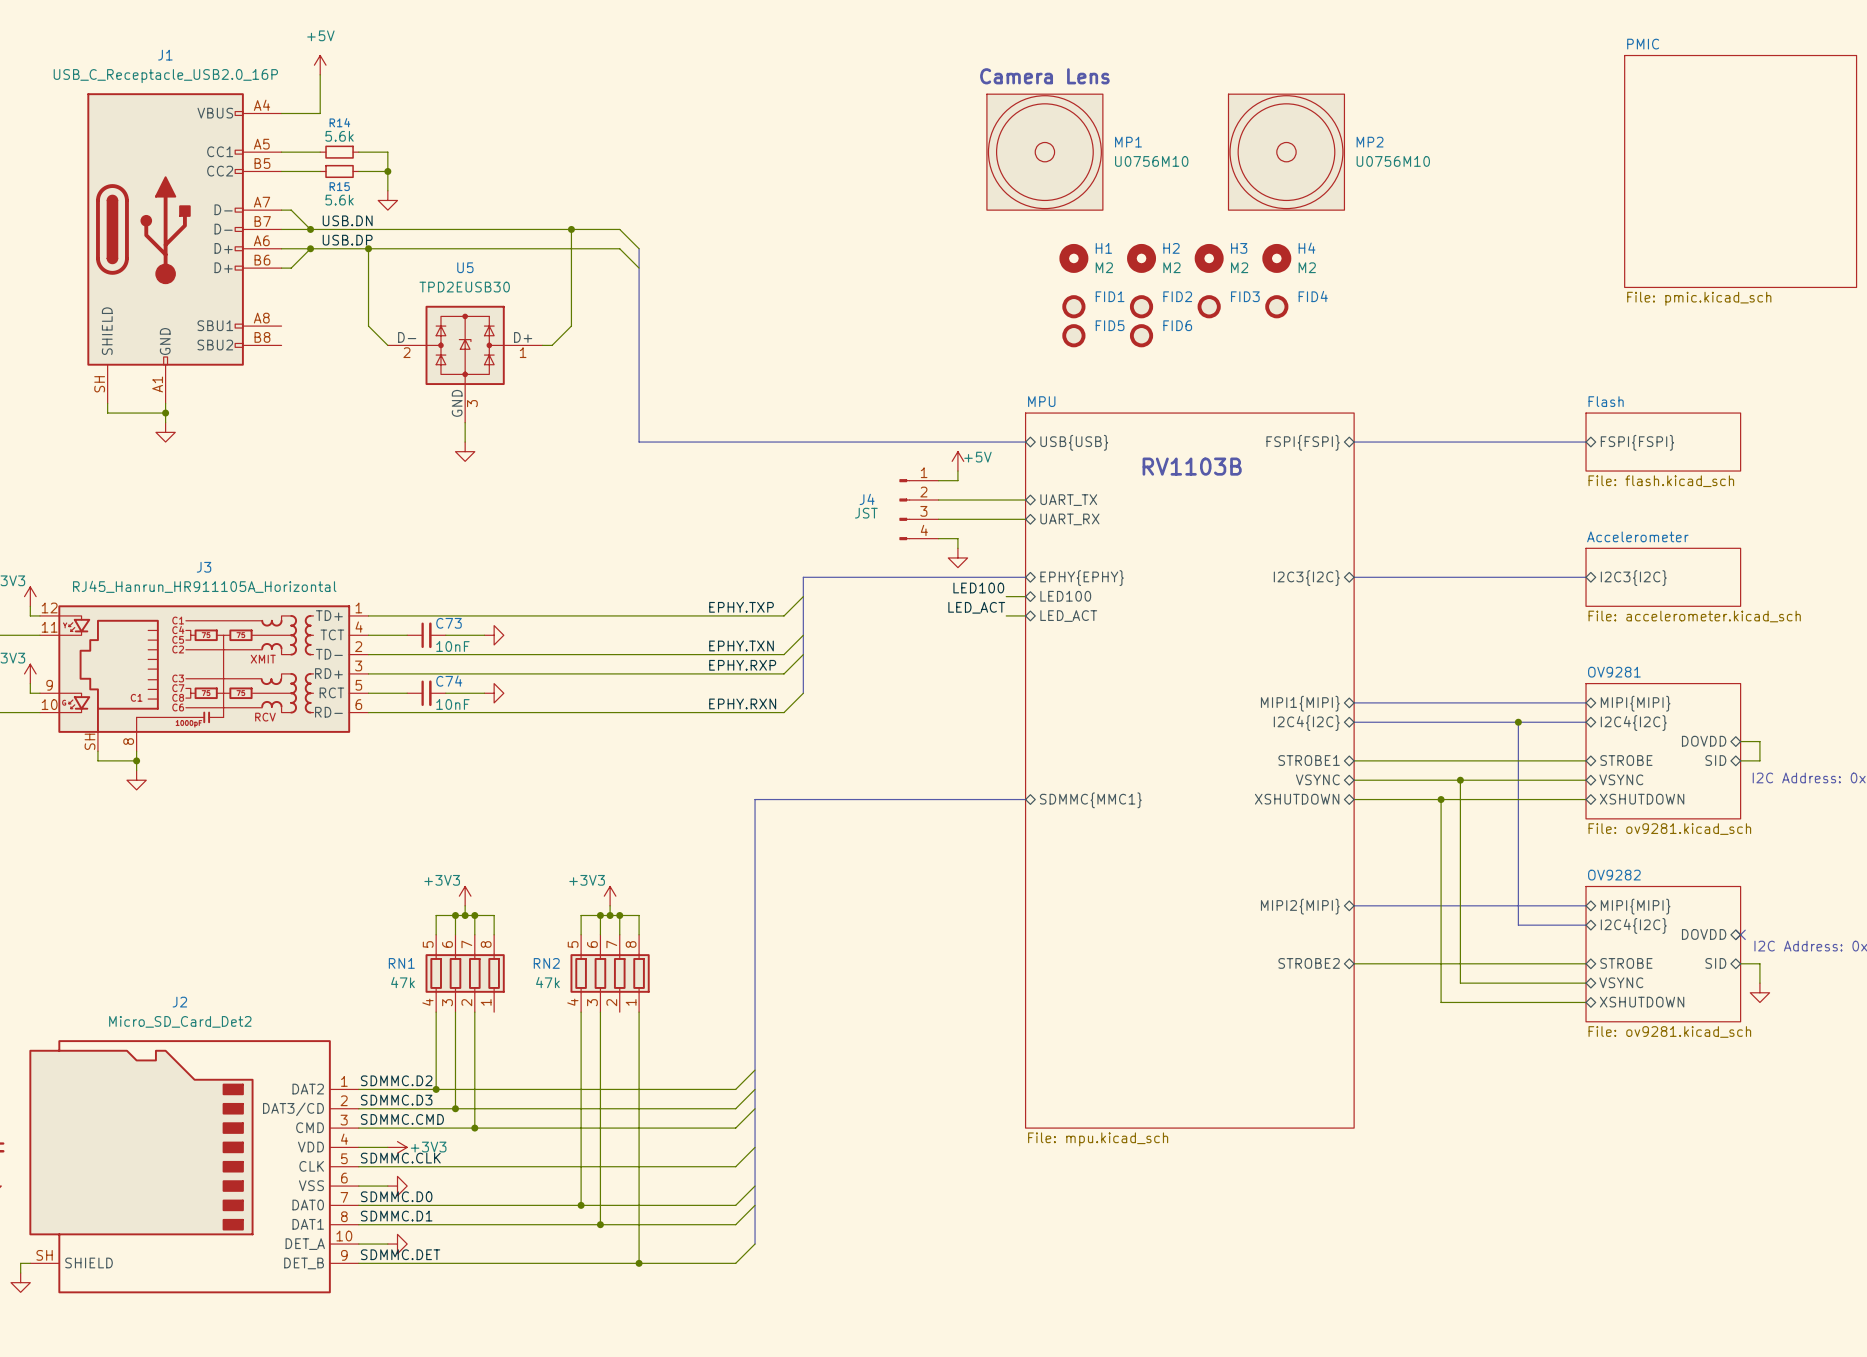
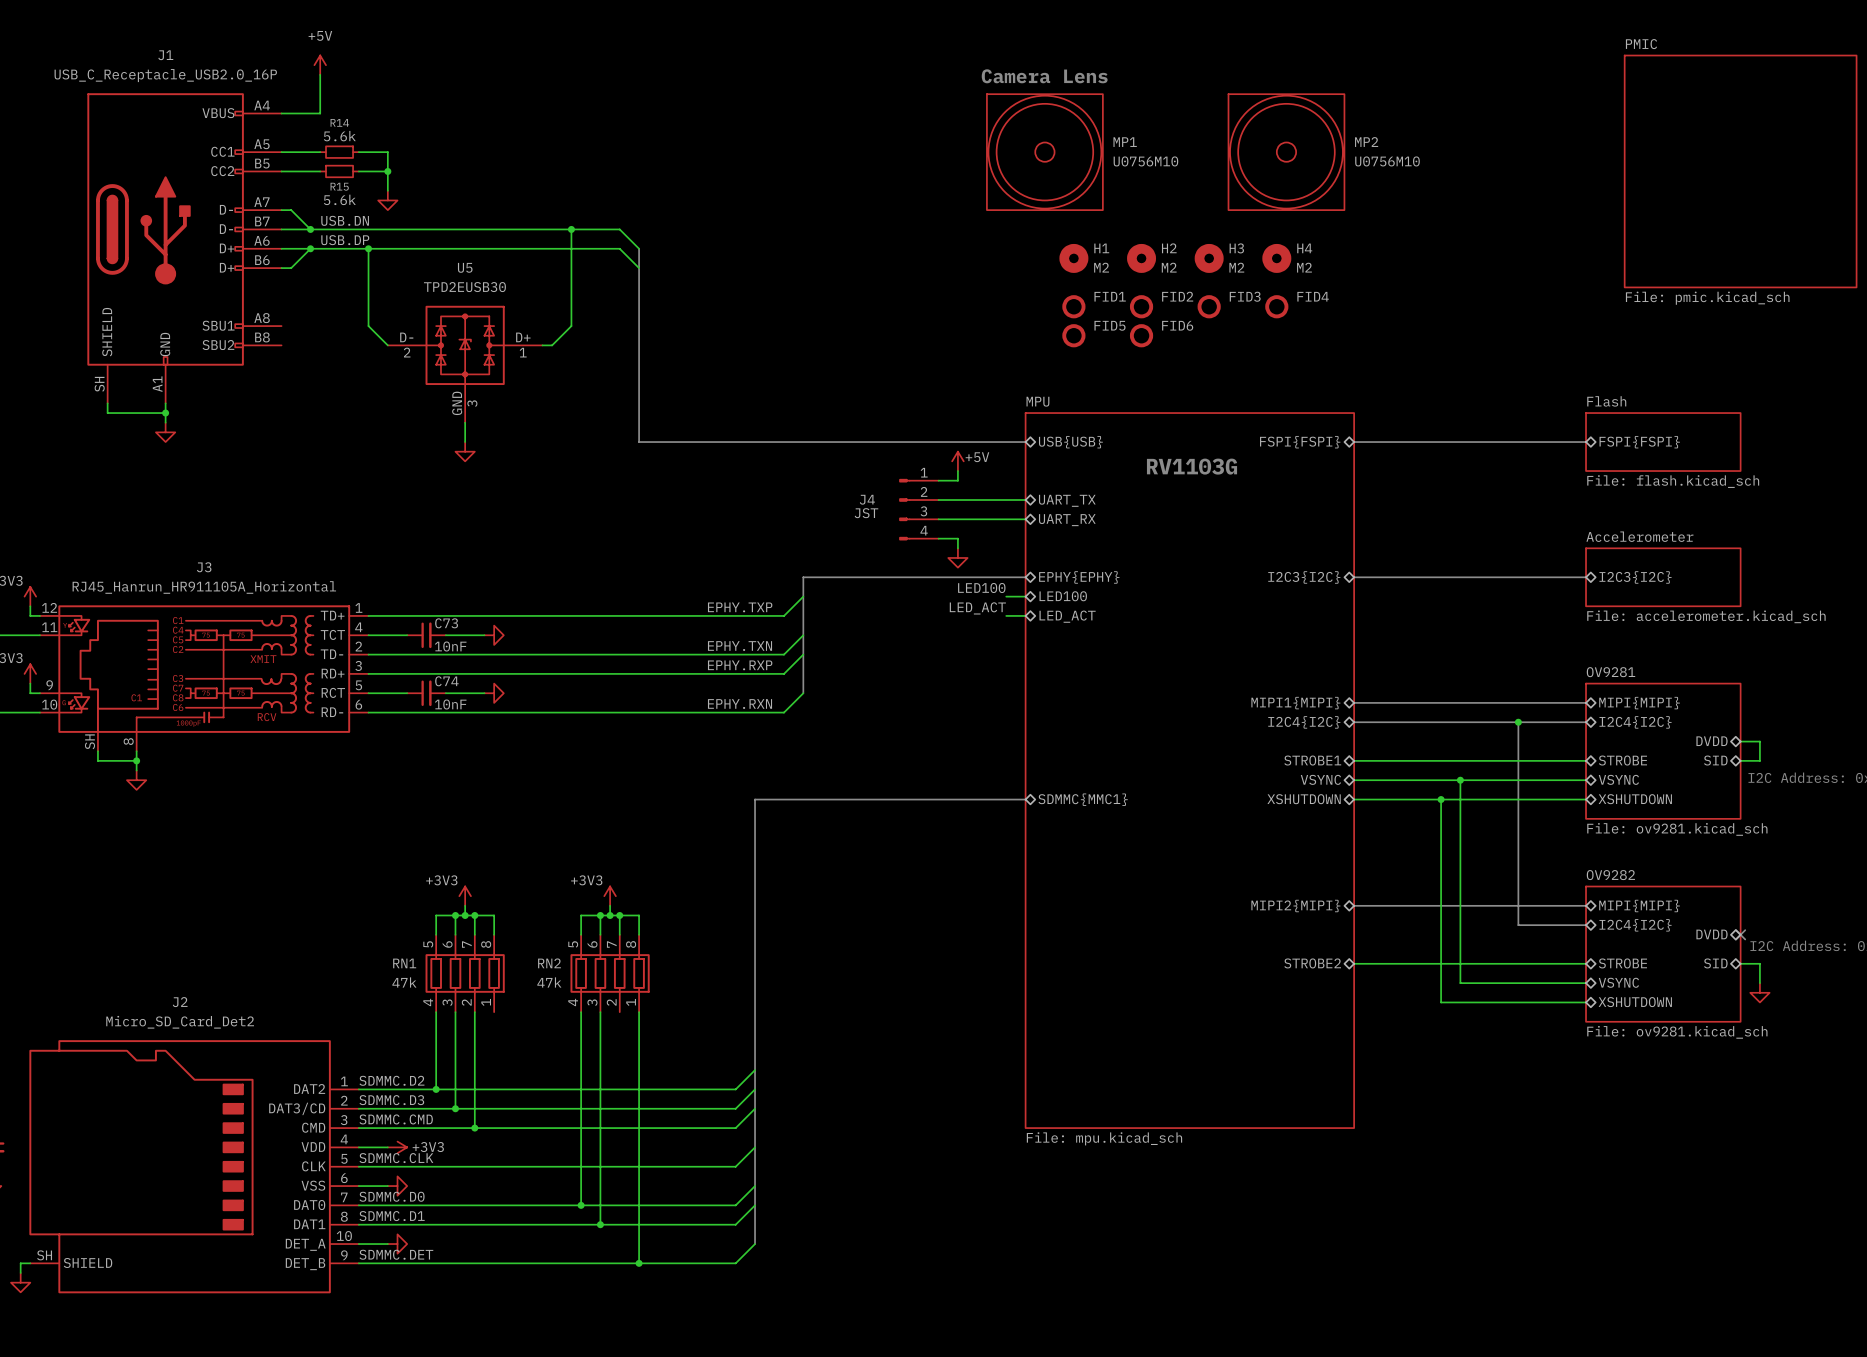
text: RV1103B (1192, 466) -> RV1103G (1192, 466)
sheet pin: DOVDD (1704, 741) -> DVDD (1712, 741)
sheet pin: DOVDD (1704, 934) -> DVDD (1712, 934)

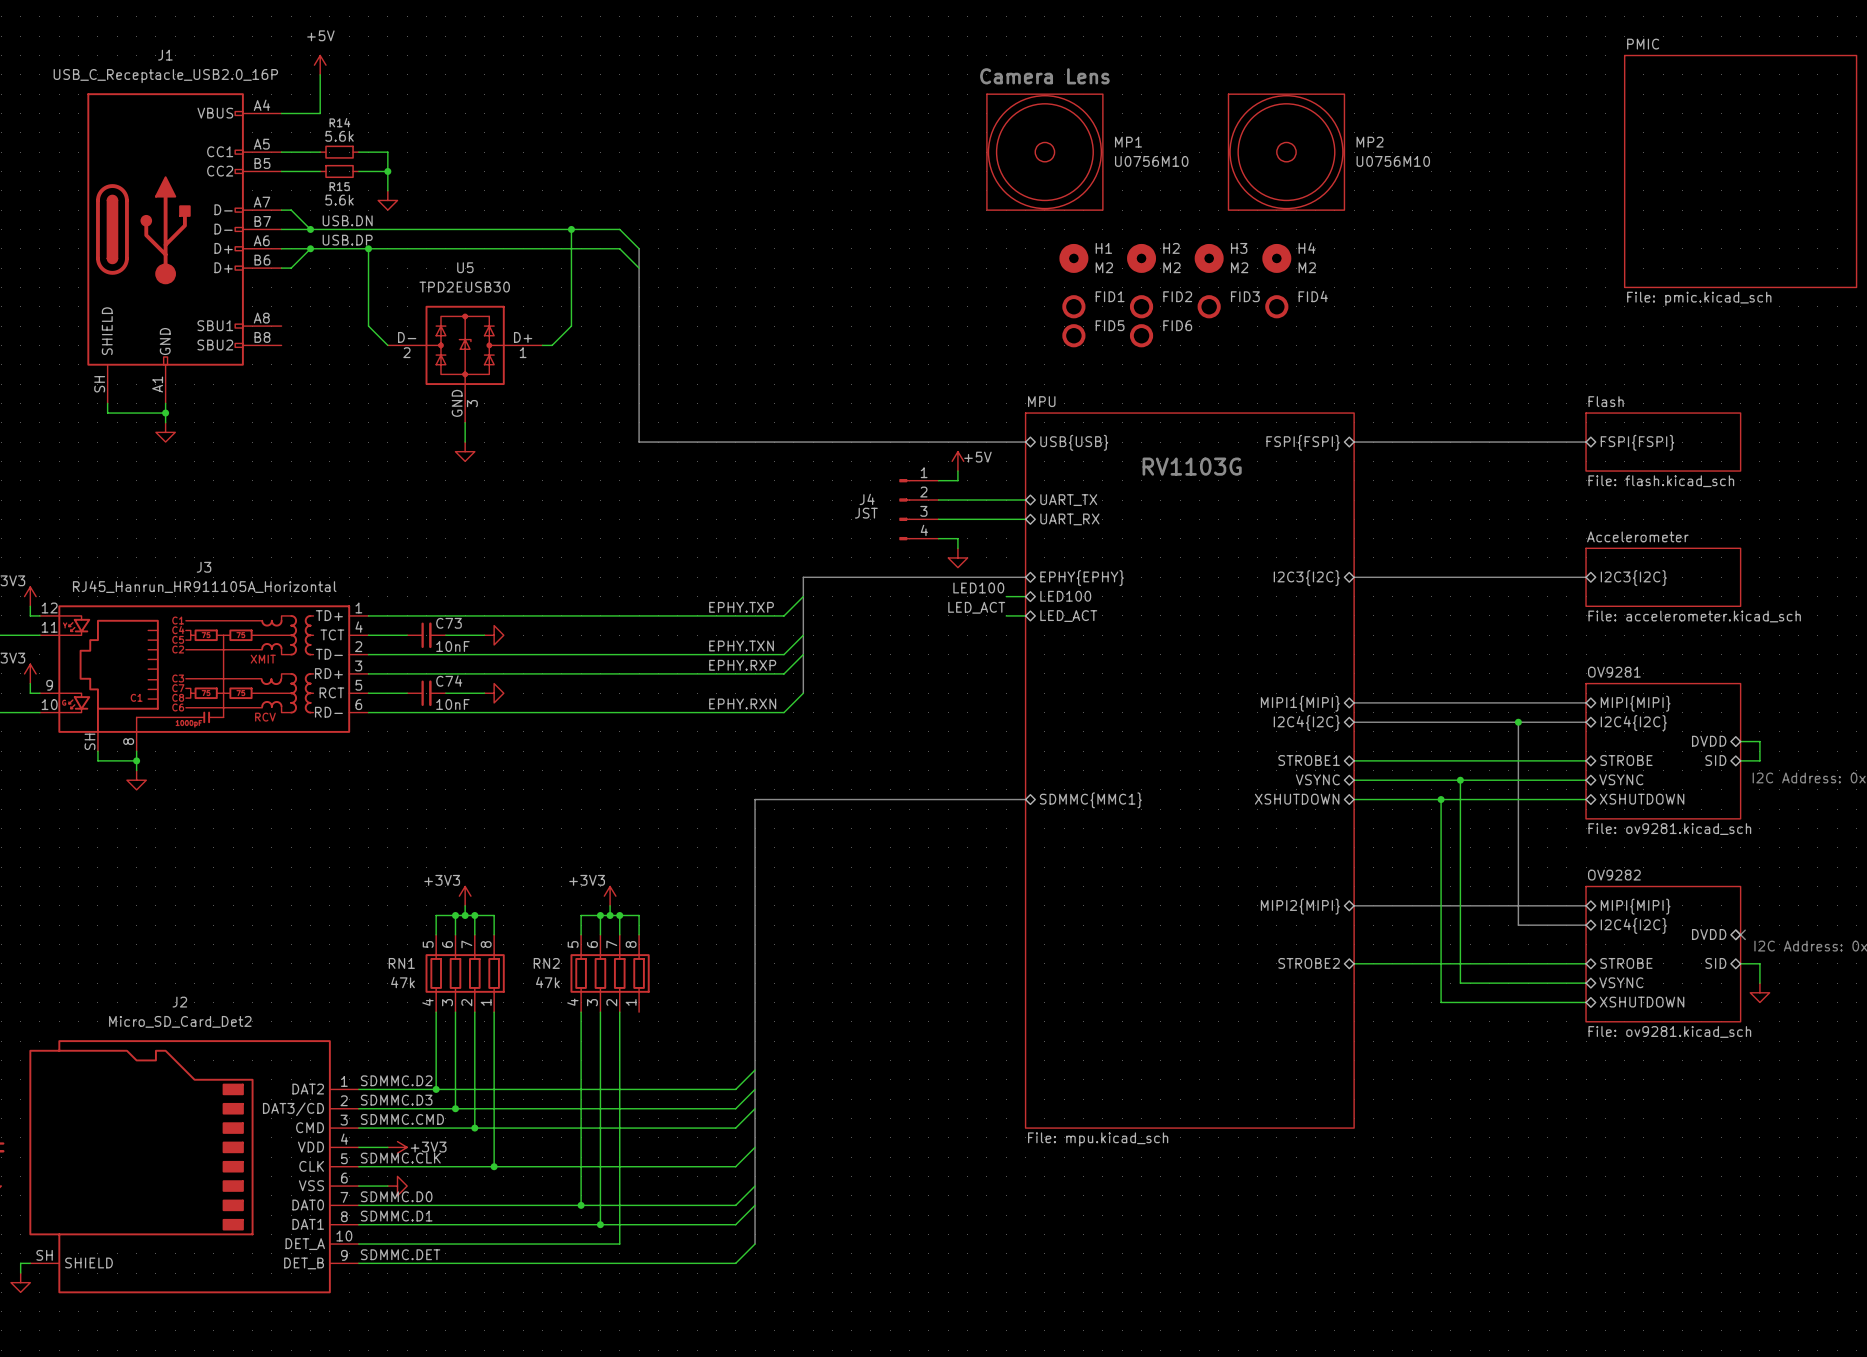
wire: none -> (494, 1012) (494, 1166)
wire: none -> (619, 1012) (619, 1244) (387, 1244)
wire: (639, 1012) (639, 1263) -> none
junction: none -> (494, 1166)
power symbol: (397, 1244) -> none
junction: (639, 1263) -> none

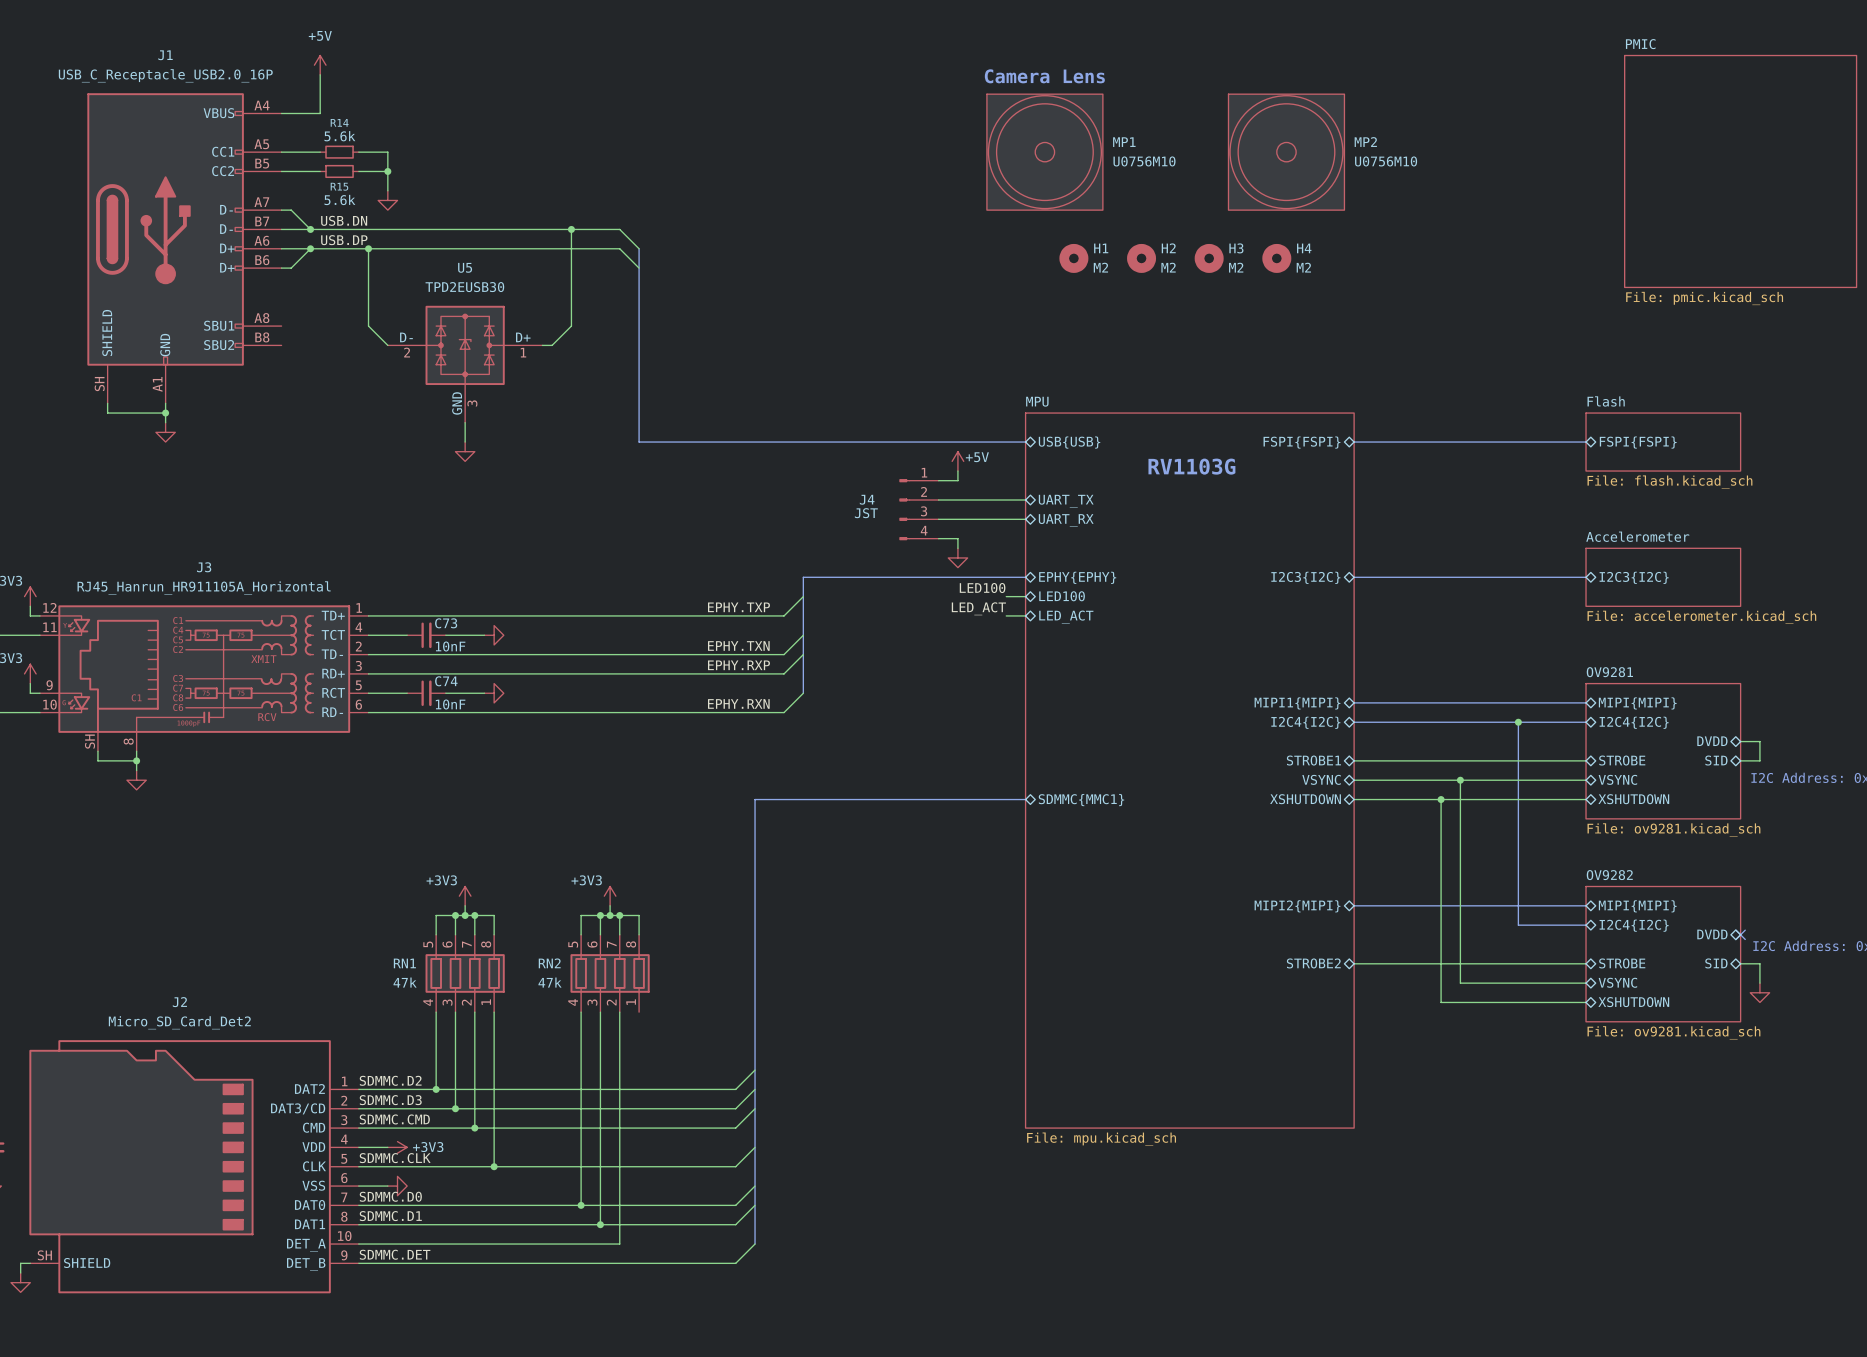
FID1: (1073, 306) -> none
FID2: (1141, 306) -> none
FID3: (1209, 306) -> none
FID4: (1276, 306) -> none
FID5: (1073, 335) -> none
FID6: (1141, 335) -> none

